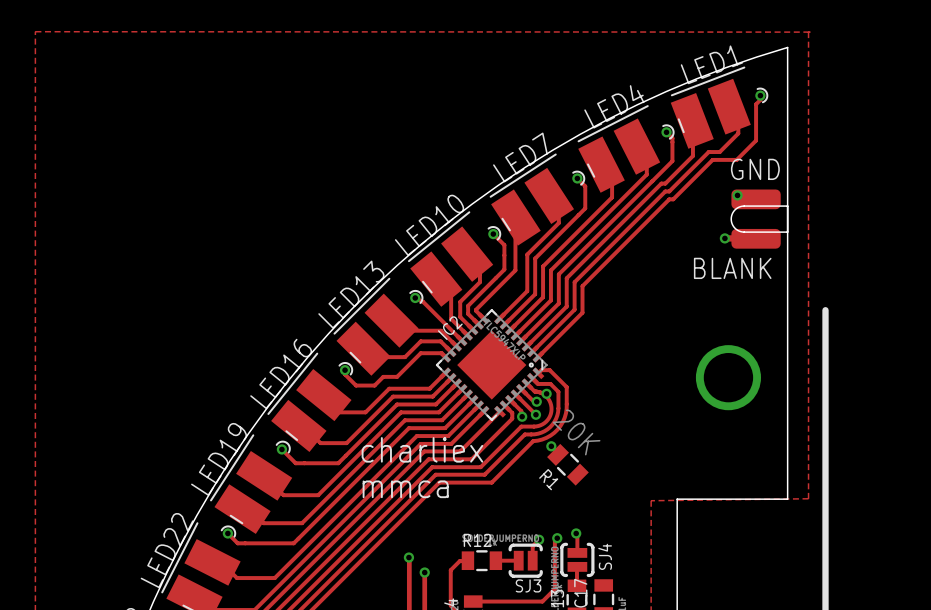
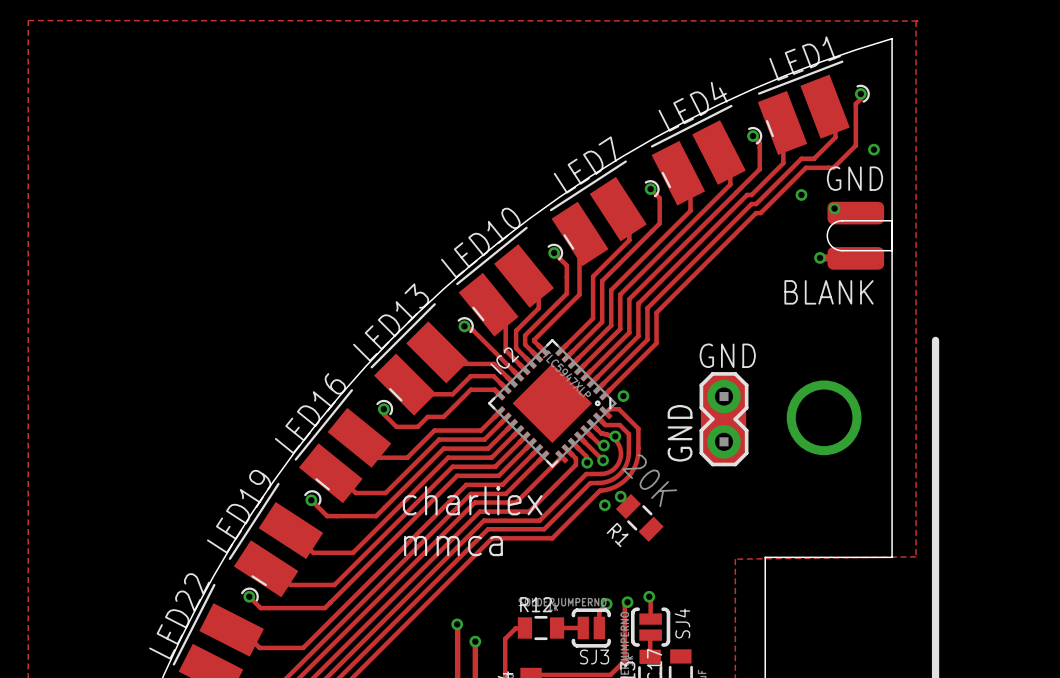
via: none -> (873, 149)
via: none -> (801, 194)
text: none -> GND (727, 355)
via: none -> (623, 396)
track: none -> (724, 395) (723, 443)
GND: none -> (724, 419)
via: none -> (604, 505)

